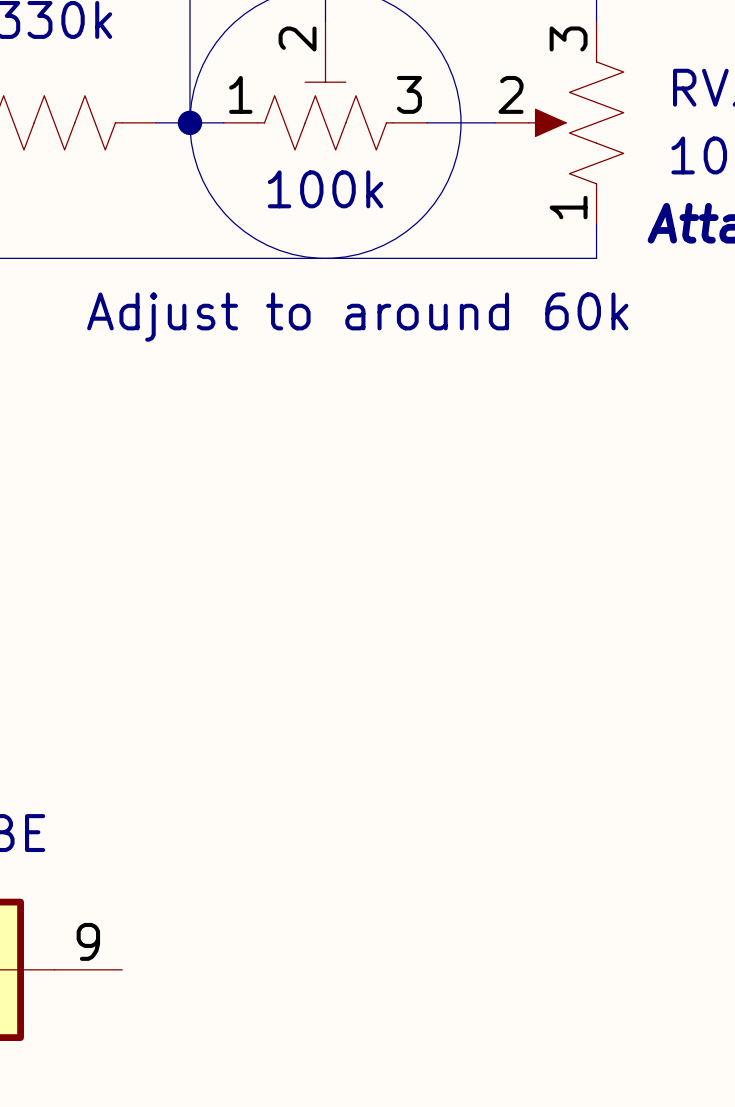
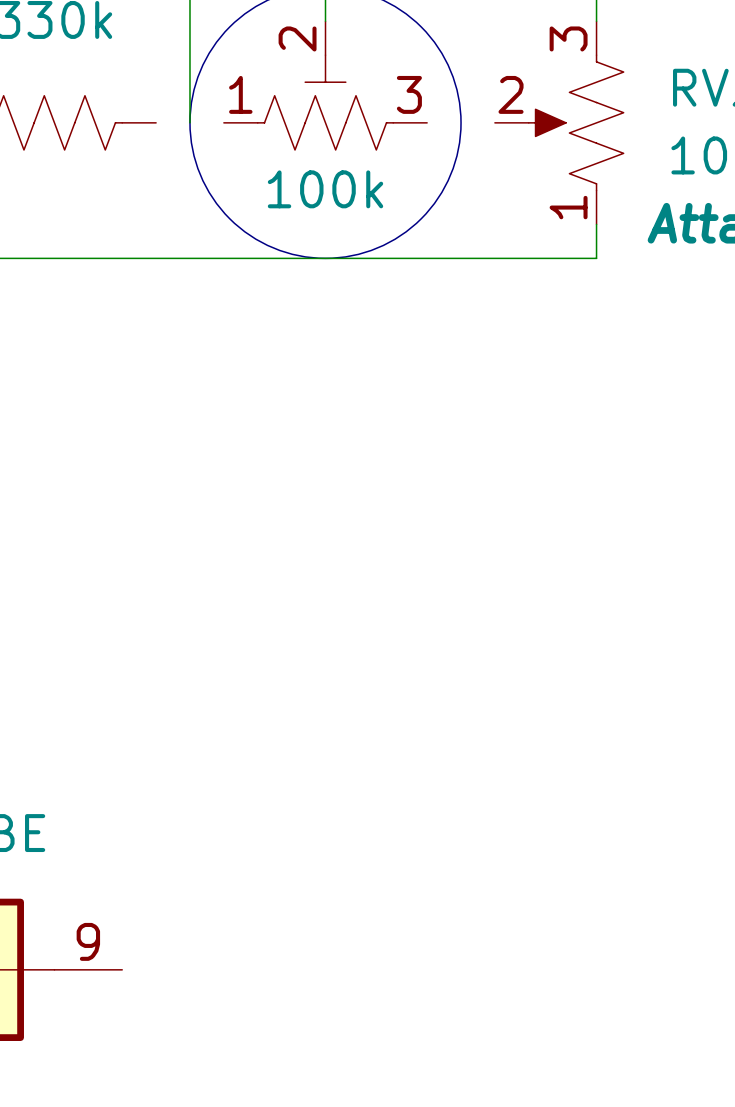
wire: (156, 122) (223, 122) -> none
junction: (189, 122) -> none
wire: (427, 122) (494, 122) -> none
text: Adjust to around 60k (357, 317) -> none

